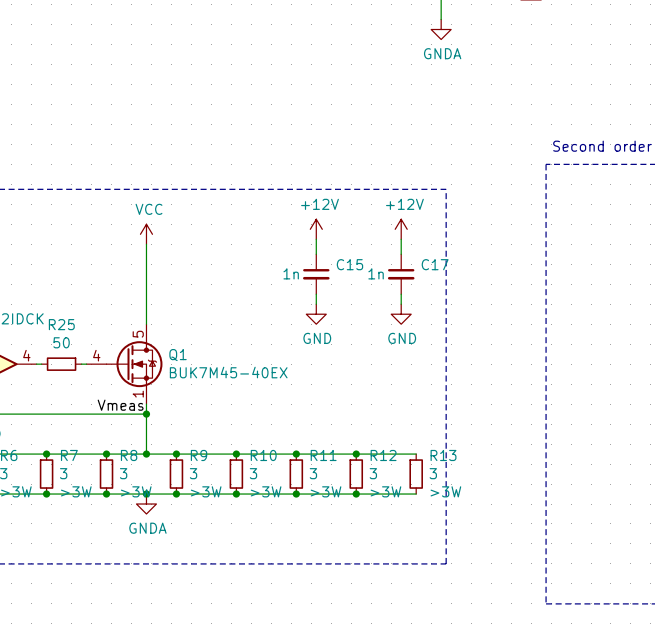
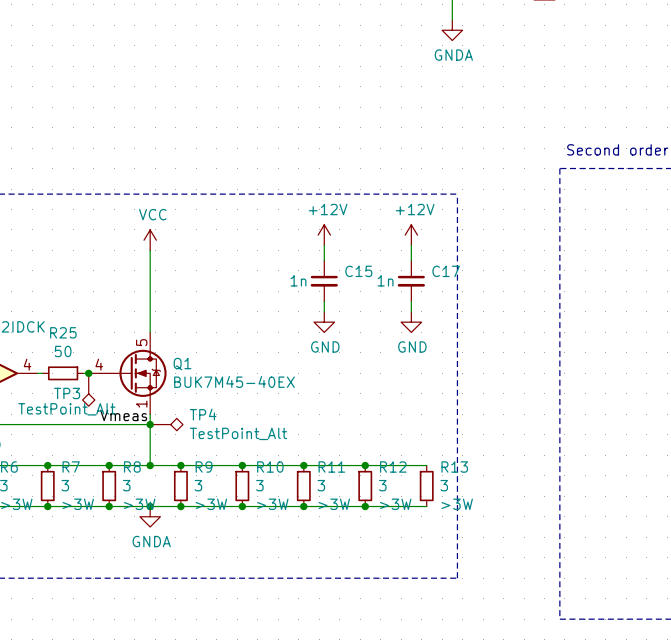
junction: none -> (88, 373)
TP3: none -> TestPoint_Alt (88, 389)
TP4: none -> TestPoint_Alt (166, 424)

